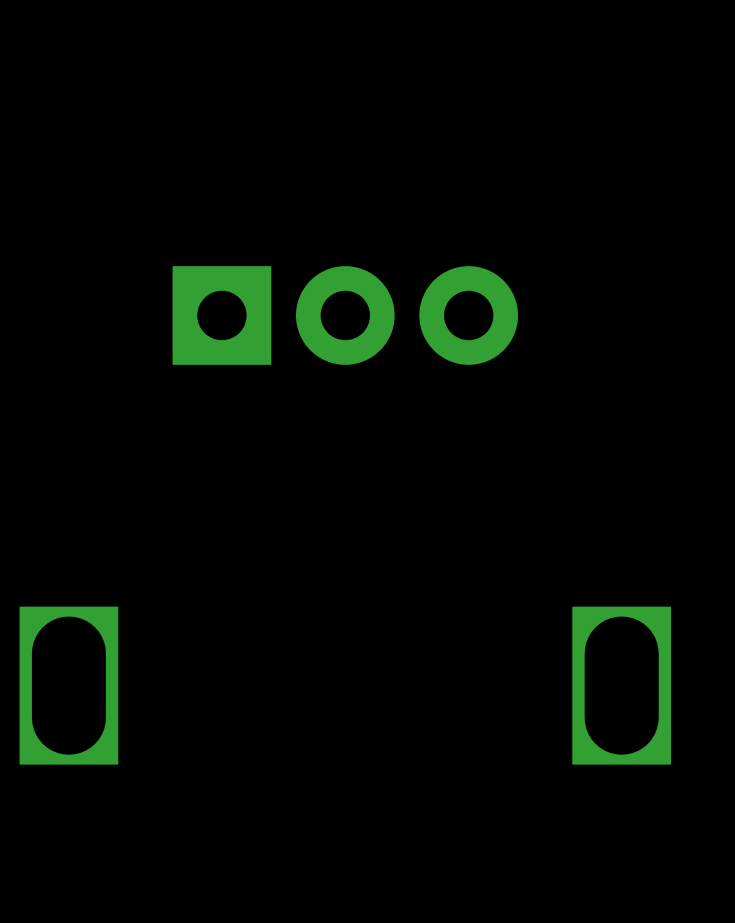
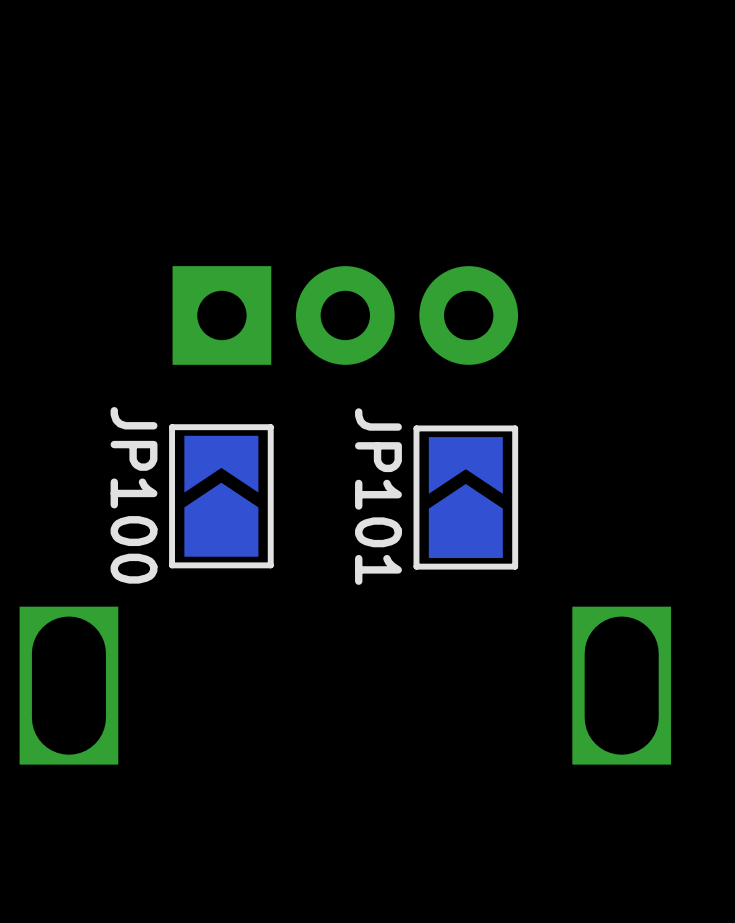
JP100: none -> (221, 496)
JP101: none -> (465, 497)

